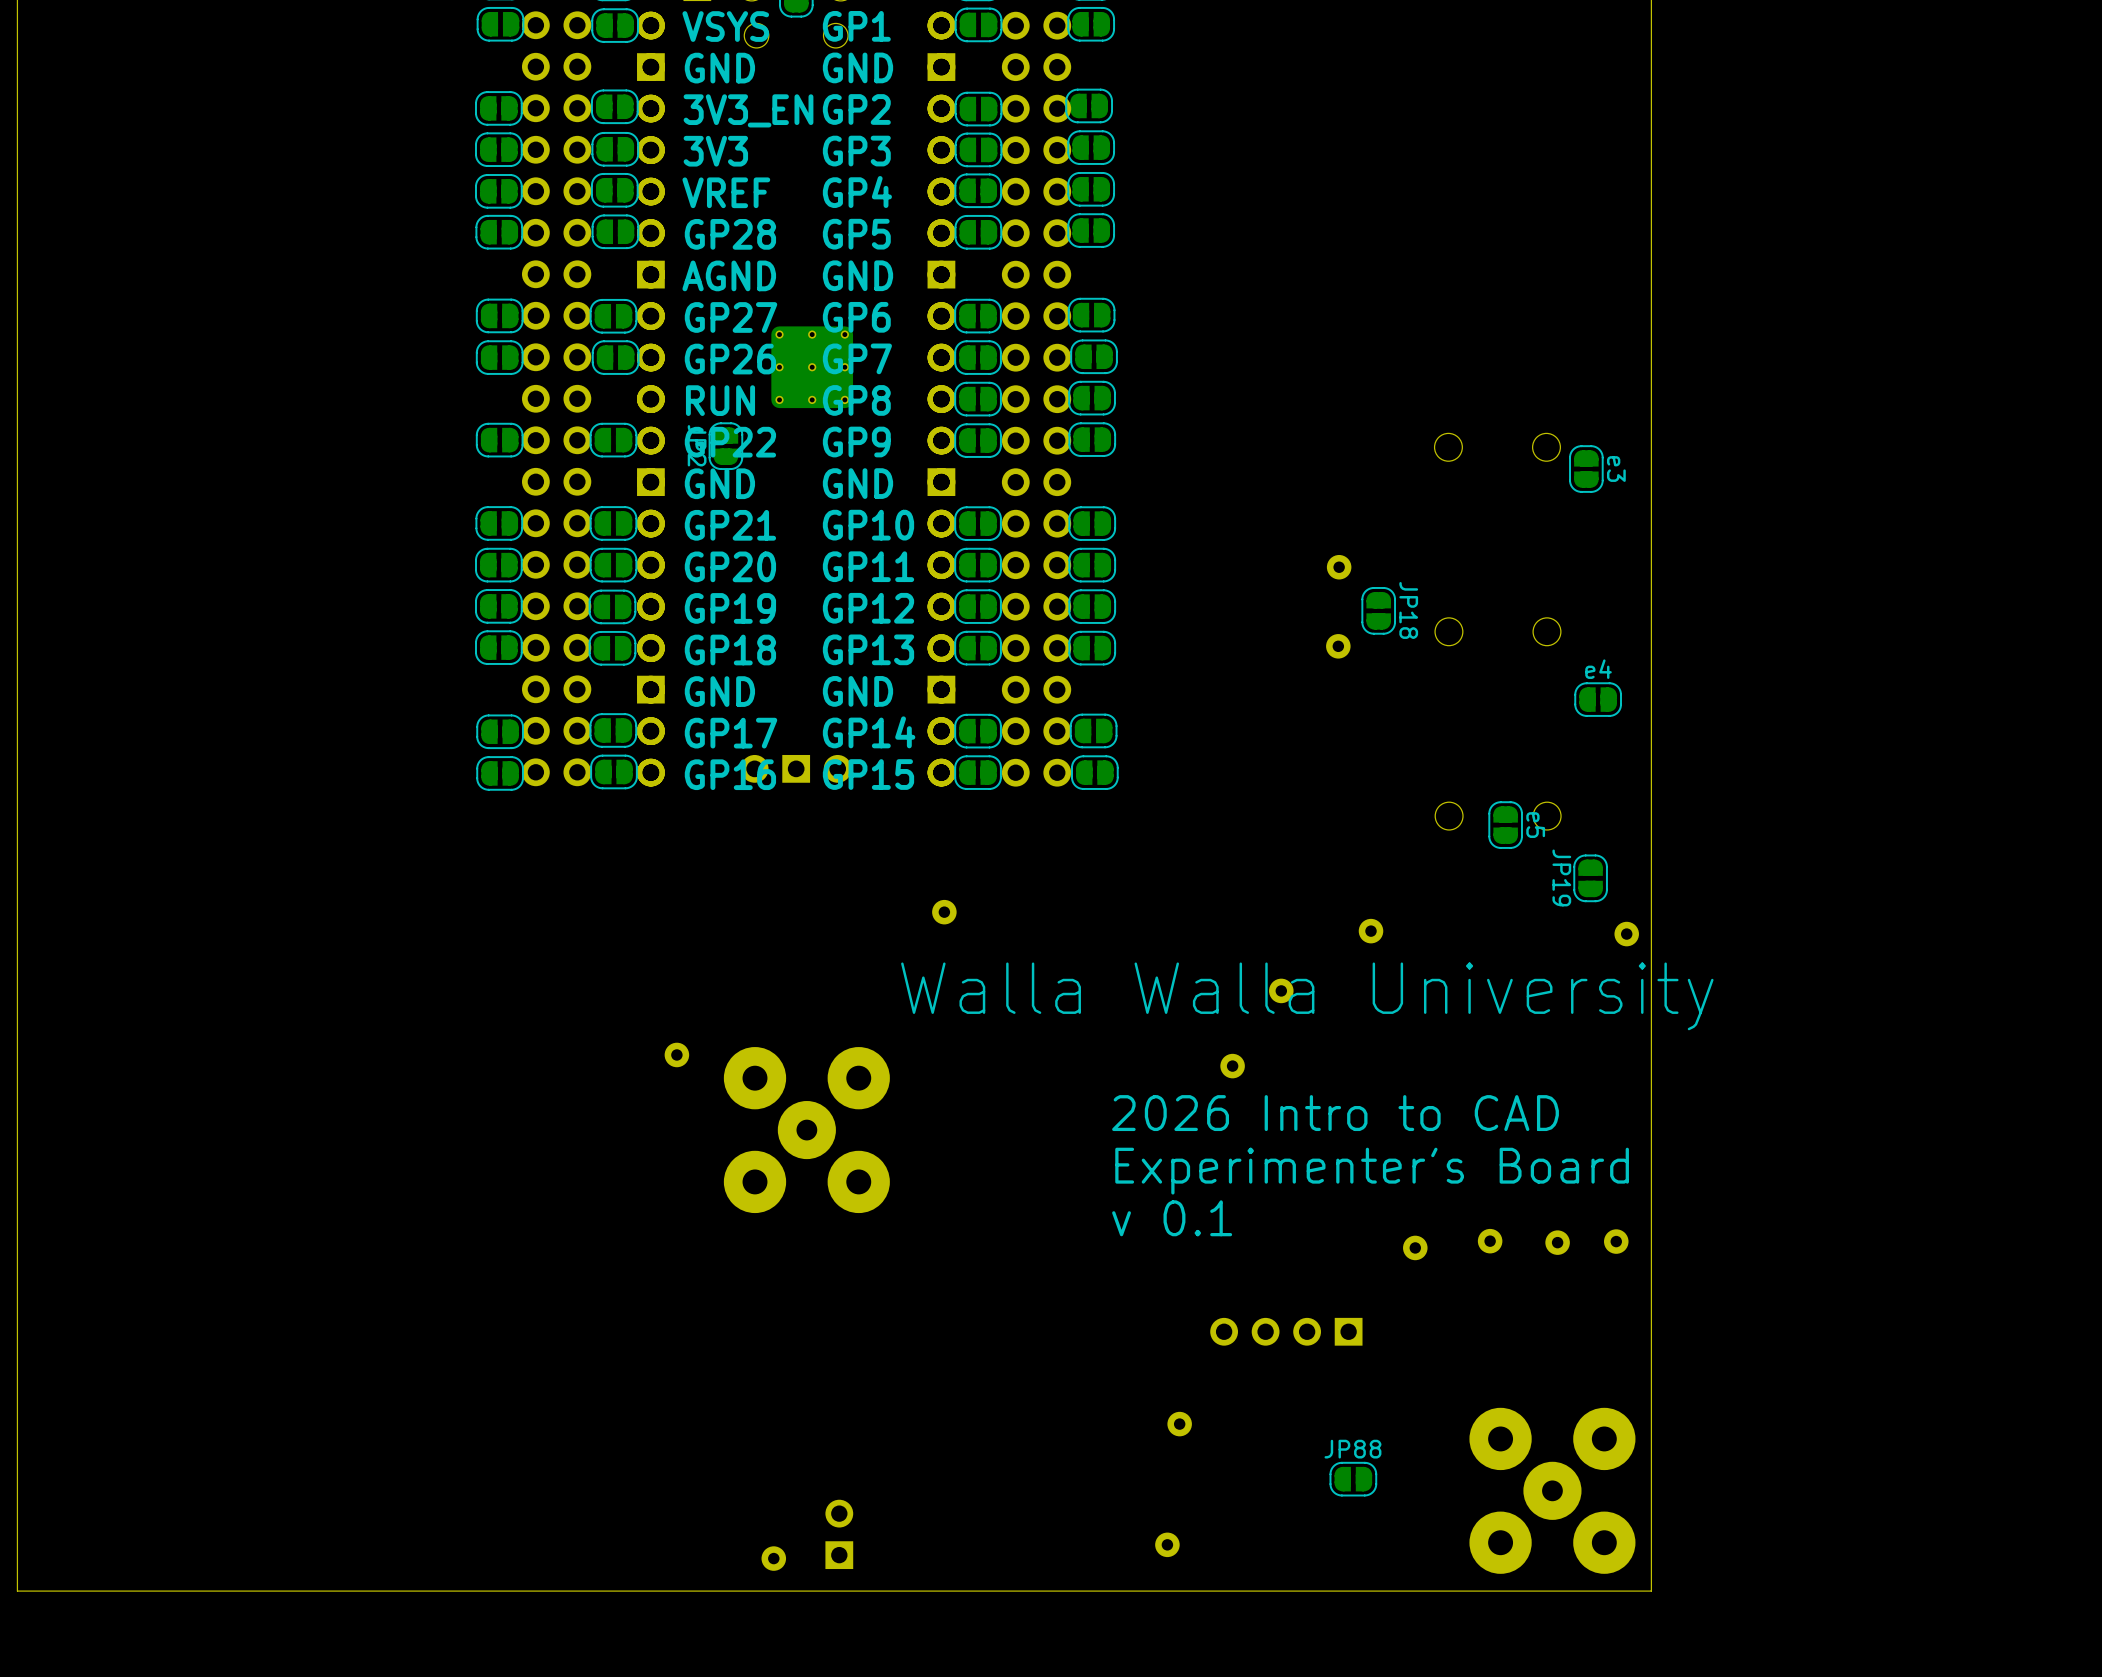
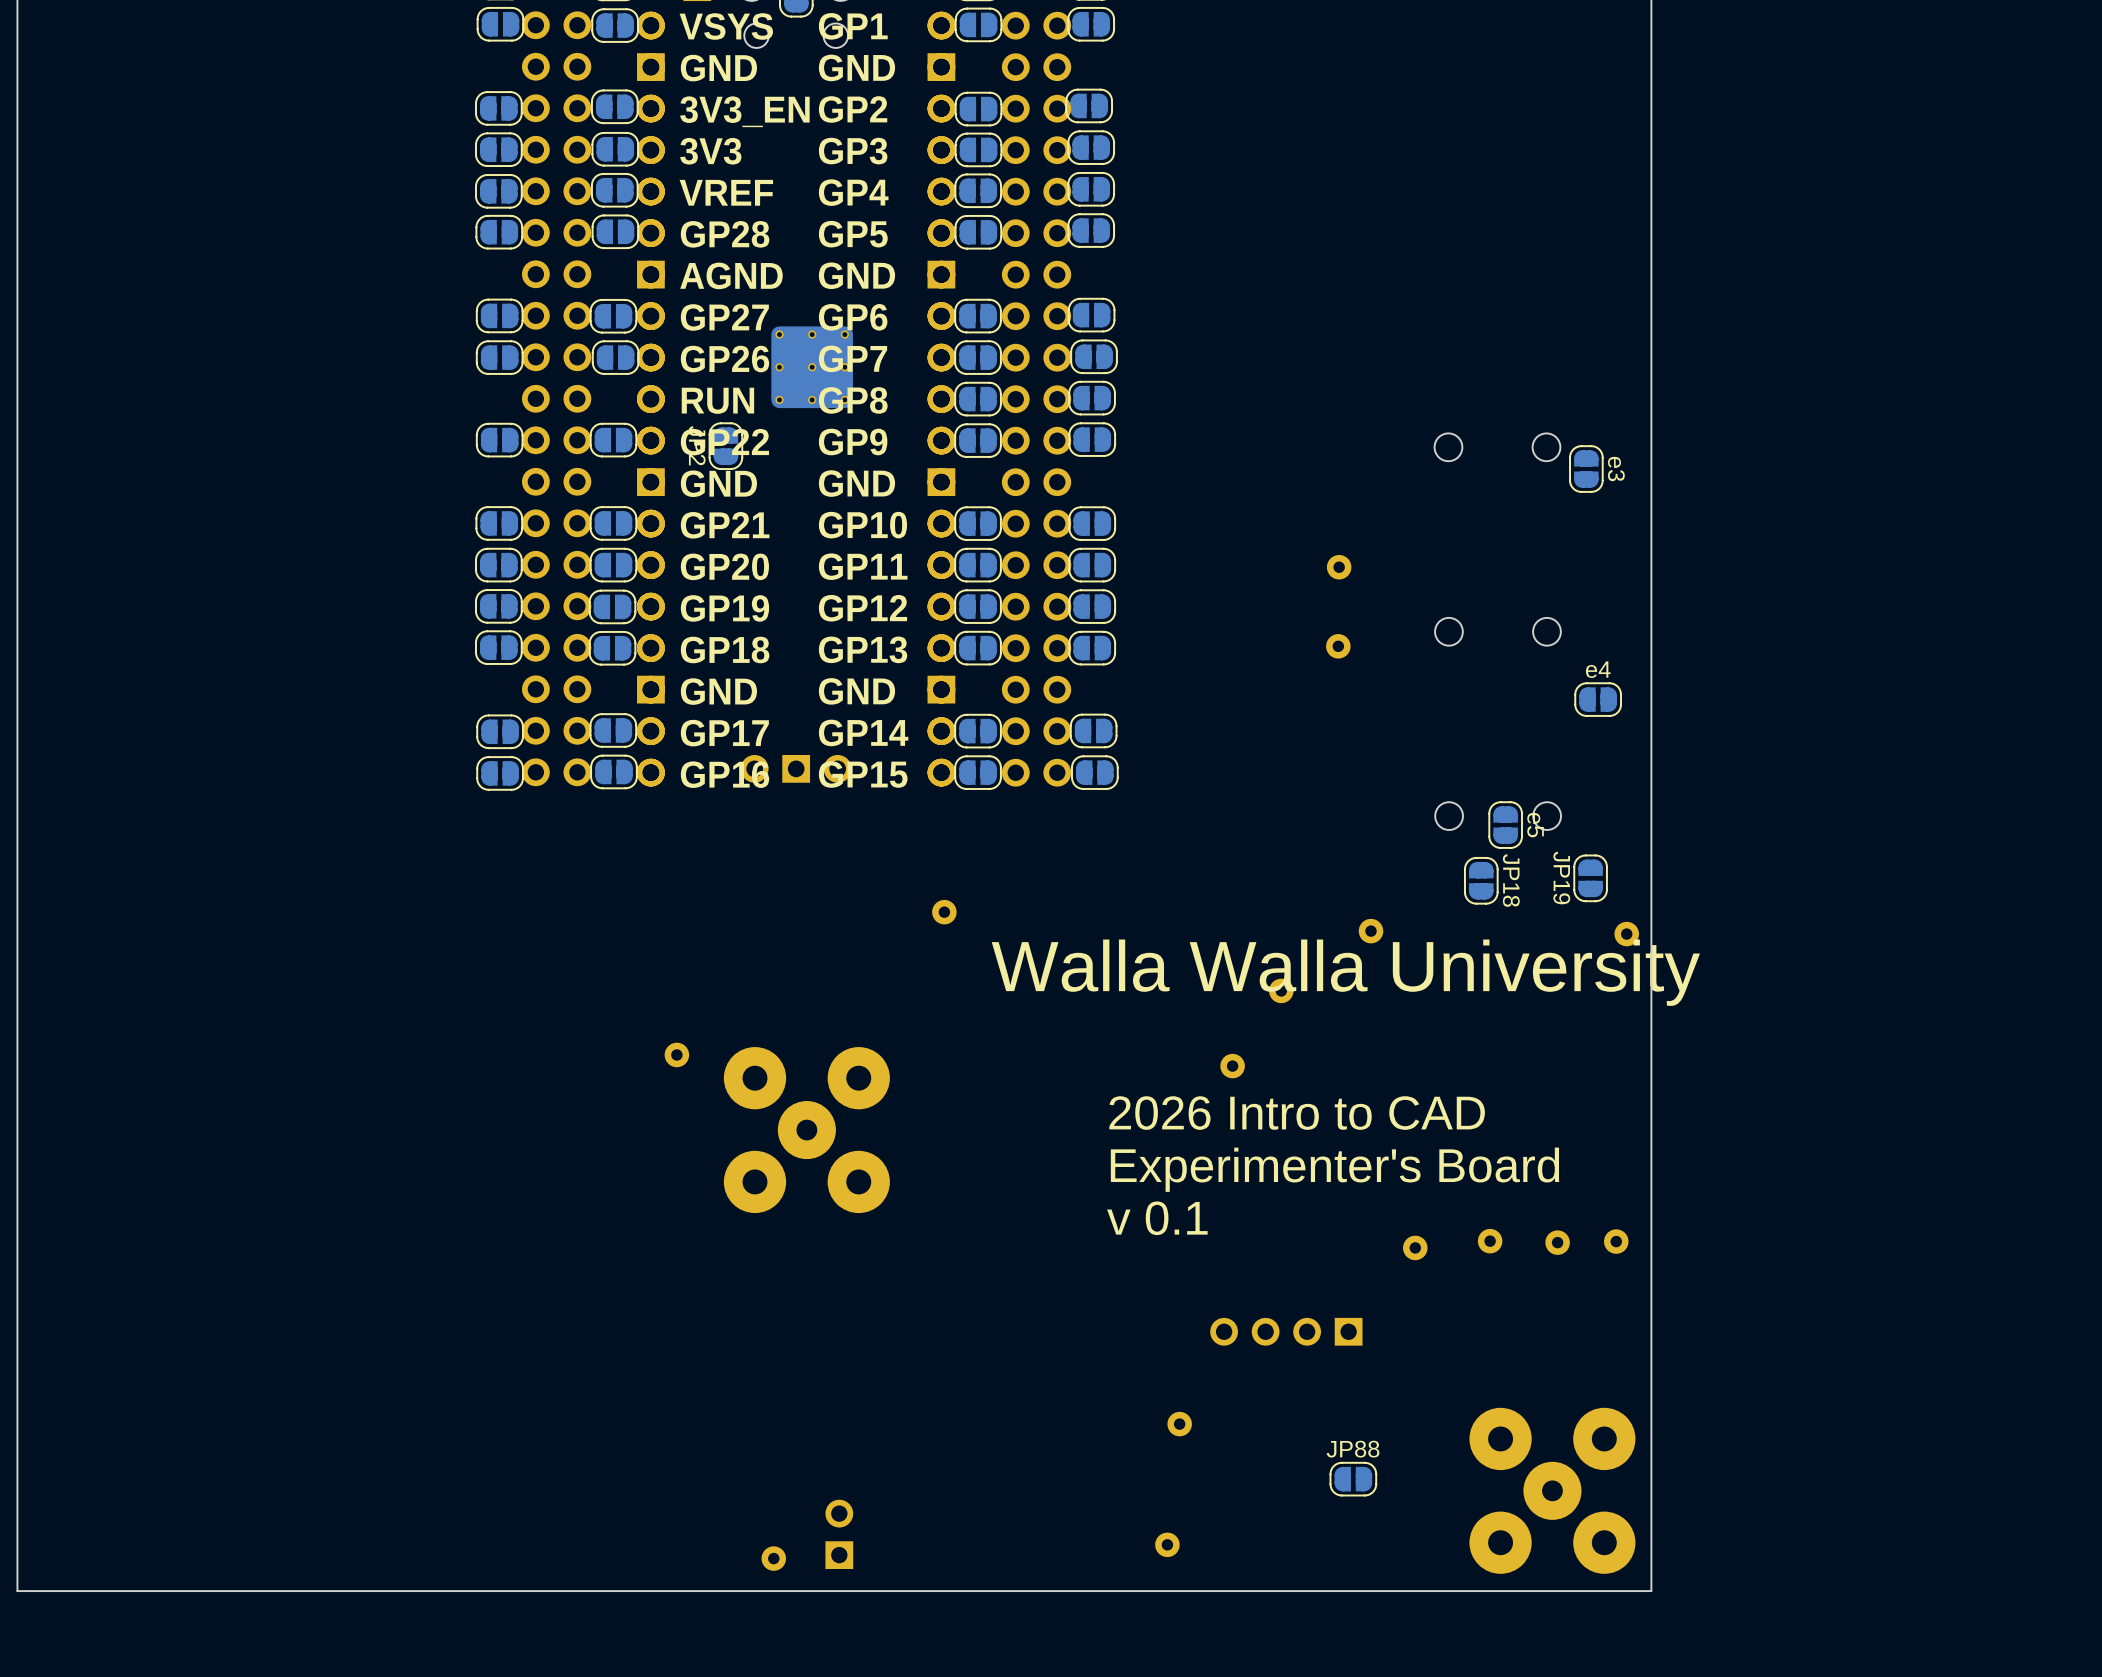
JP18 position: (1378, 610) -> (1481, 880)
text position: Walla Walla University (1307, 996) -> Walla Walla University (1345, 972)

